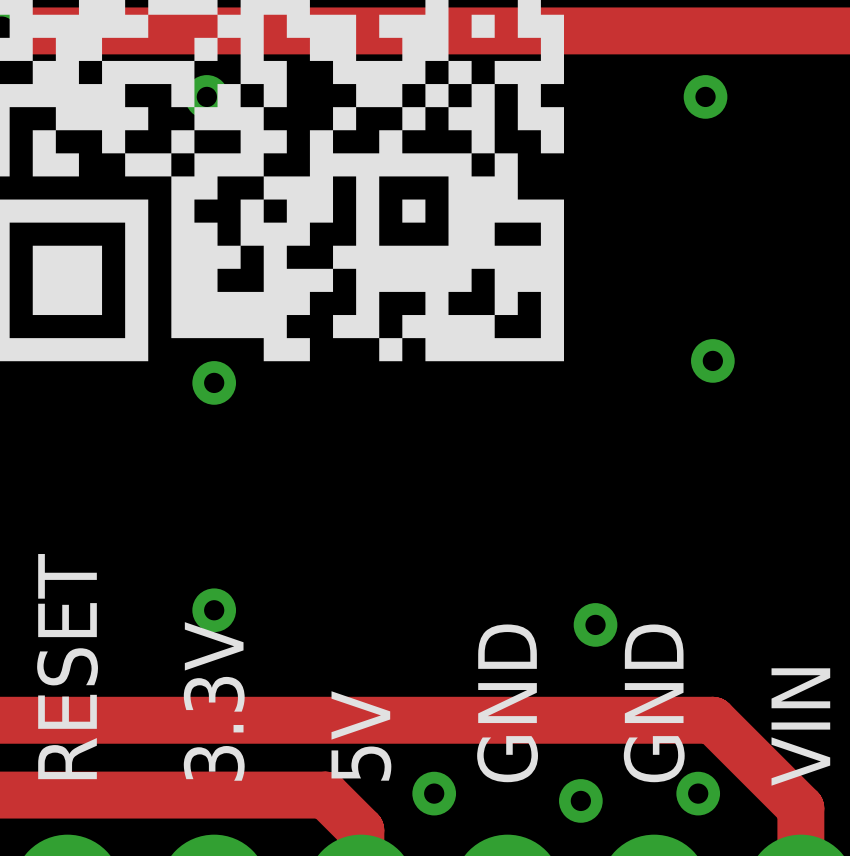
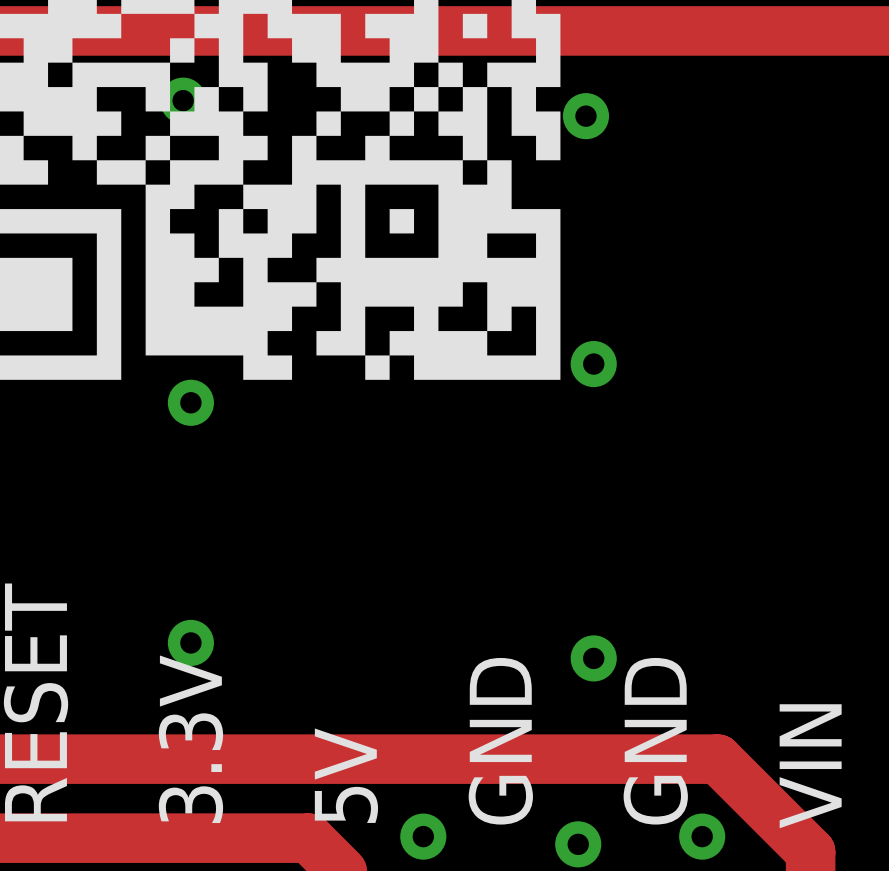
via: (705, 96) -> none
via: none -> (585, 116)
via position: (712, 360) -> (593, 364)

